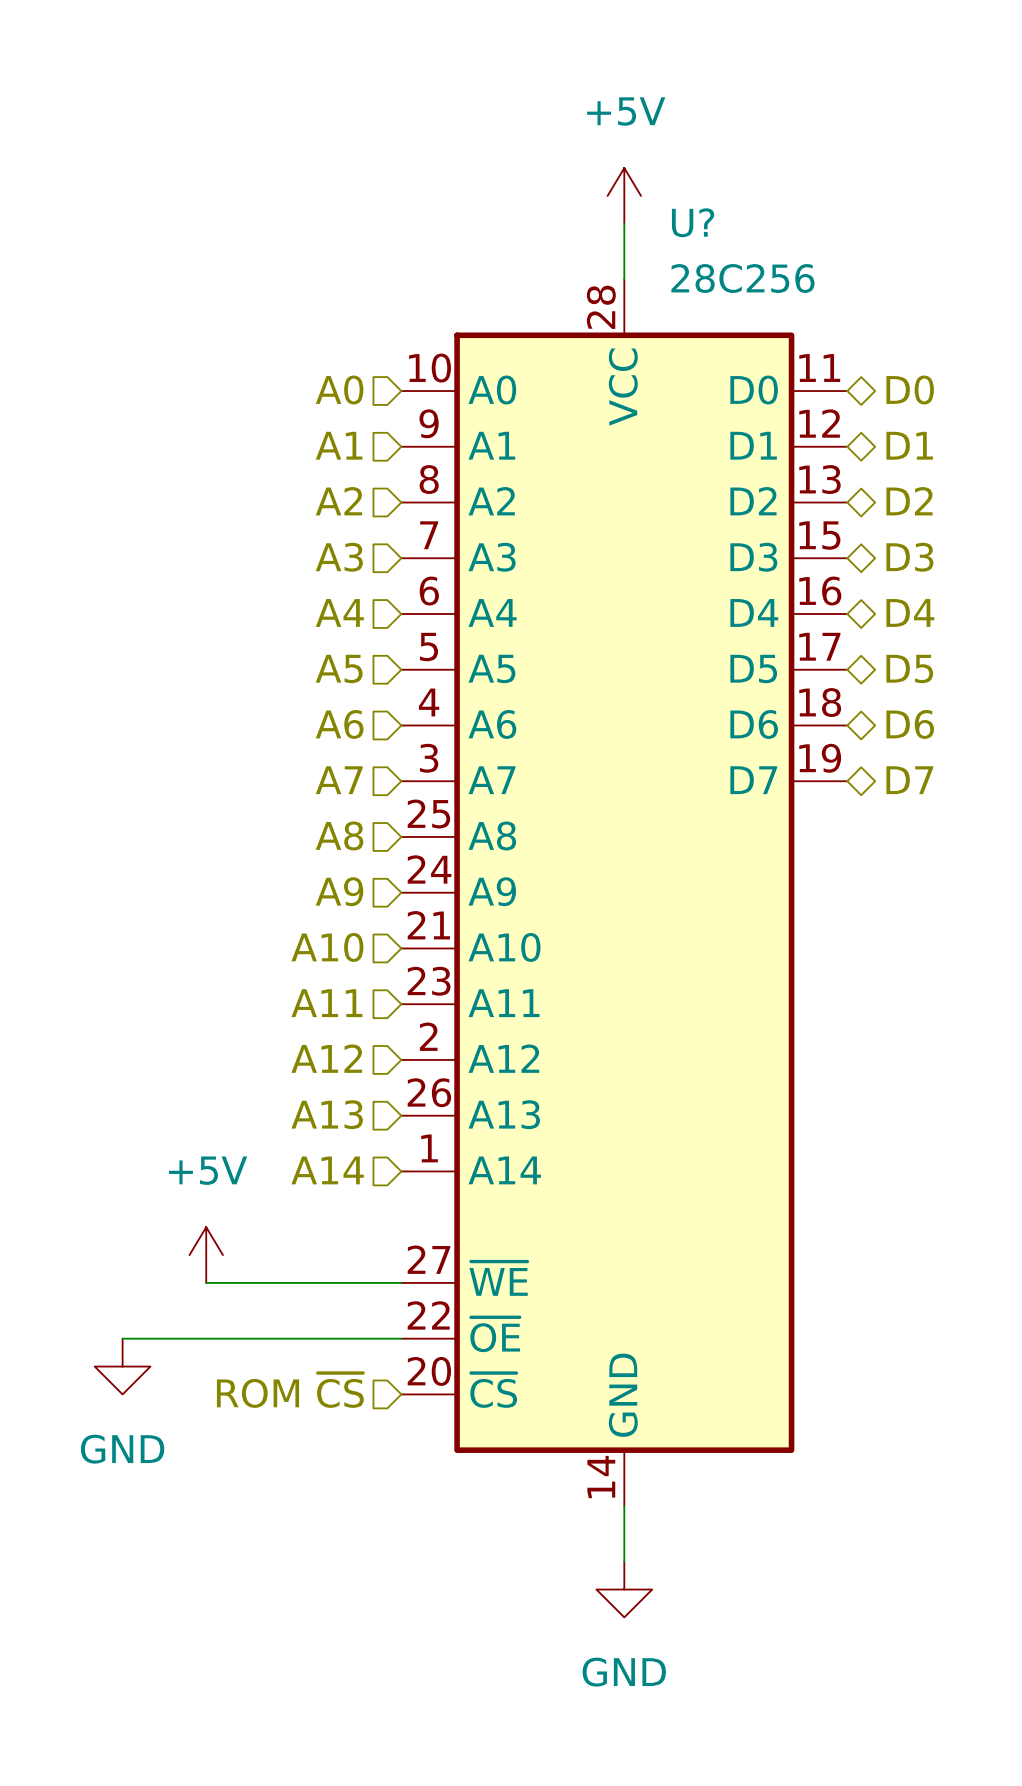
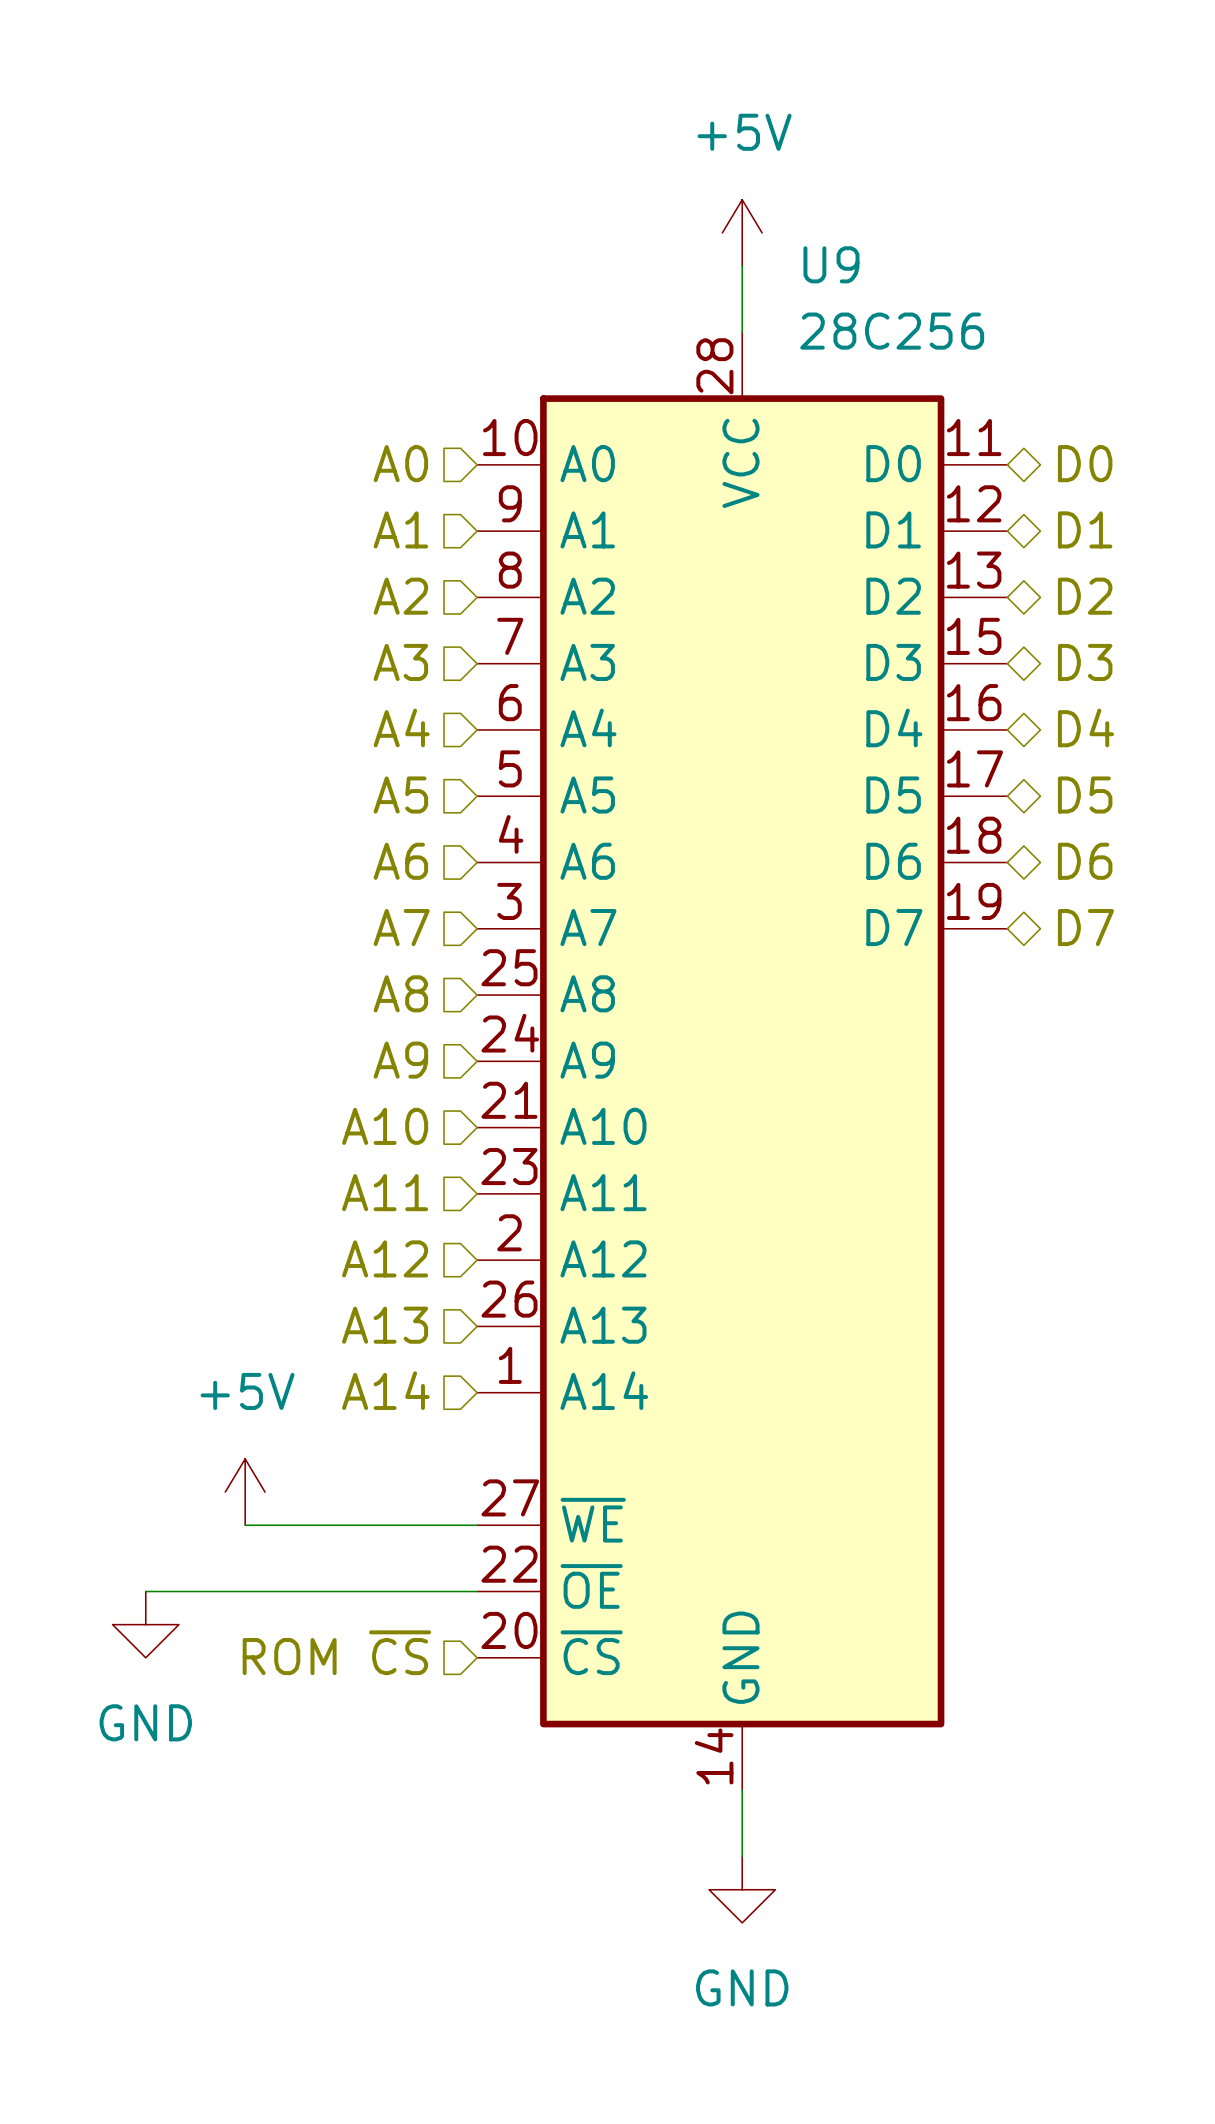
U? name: U? (693, 222) -> U9 (831, 264)

